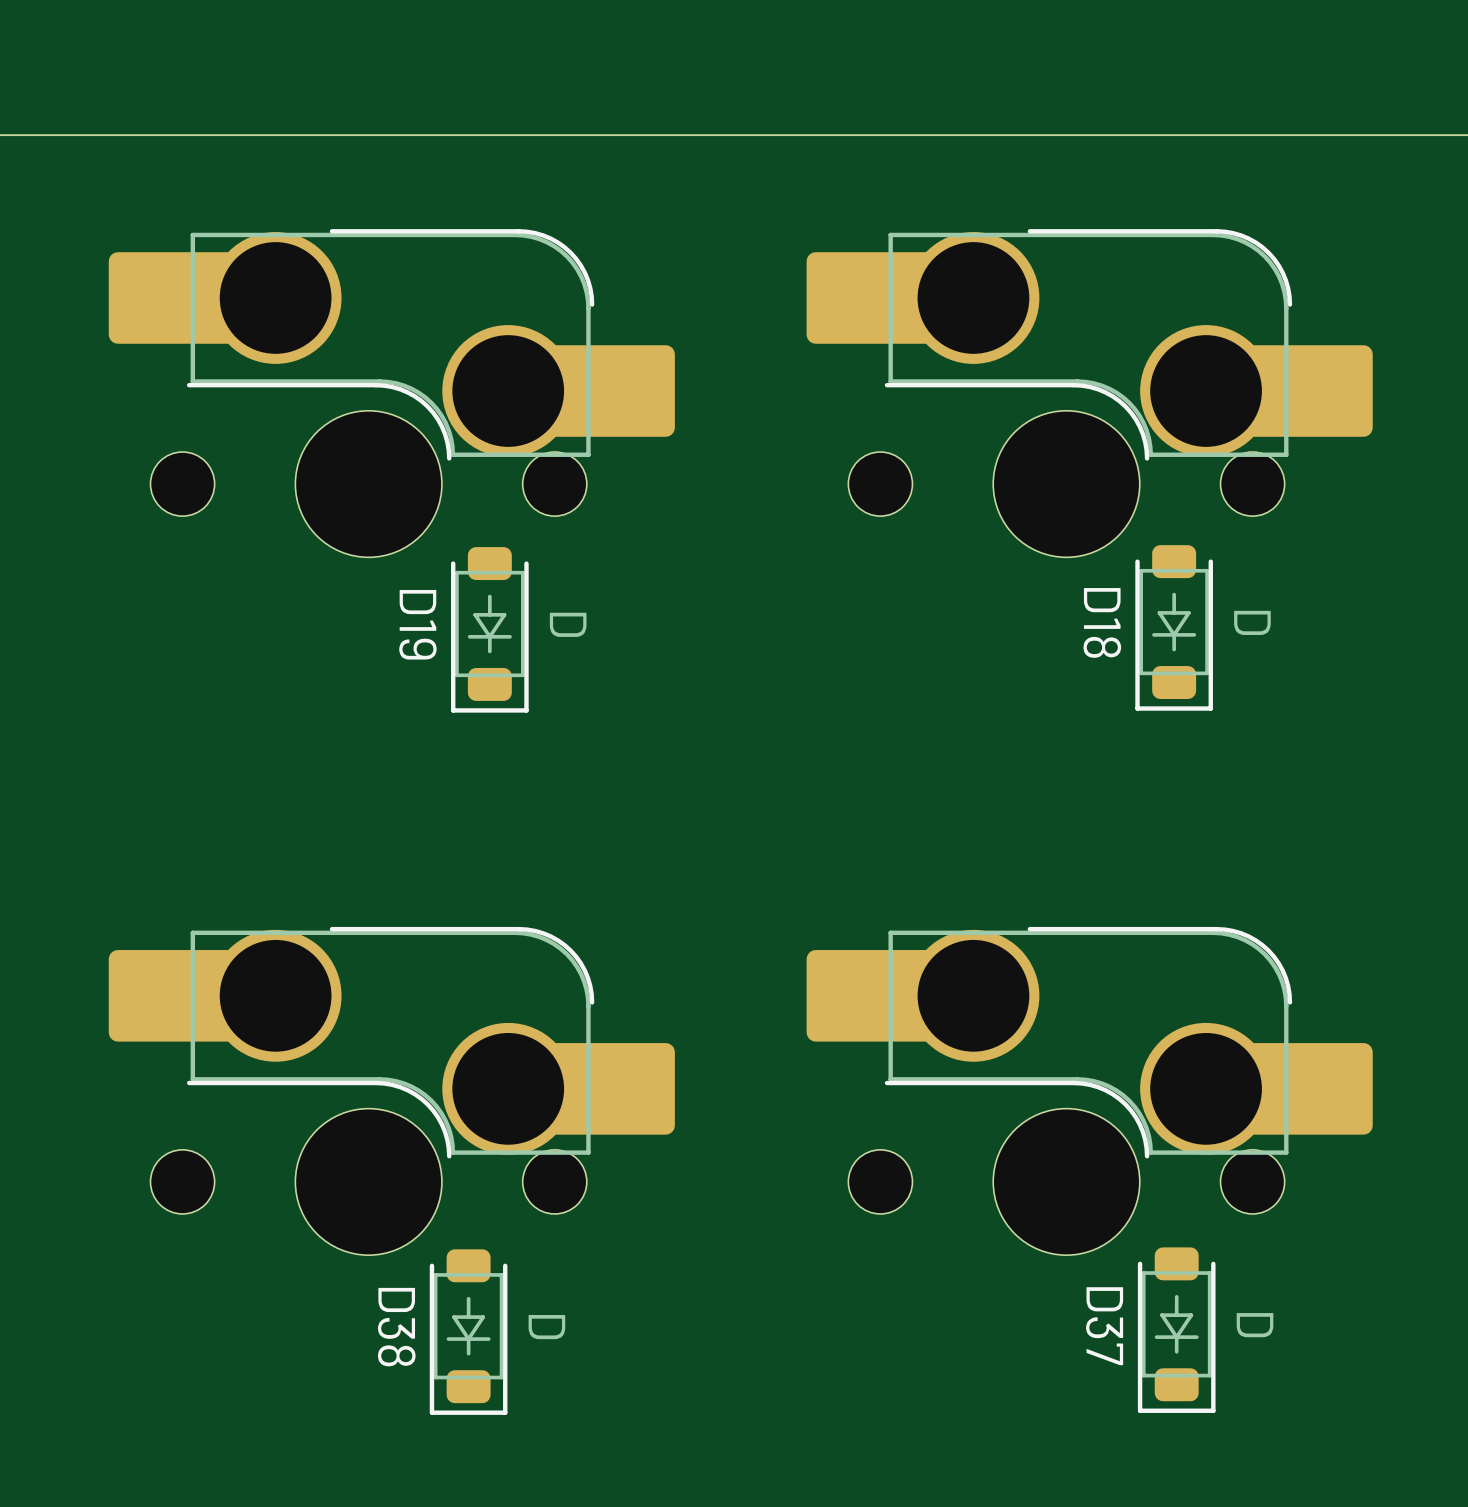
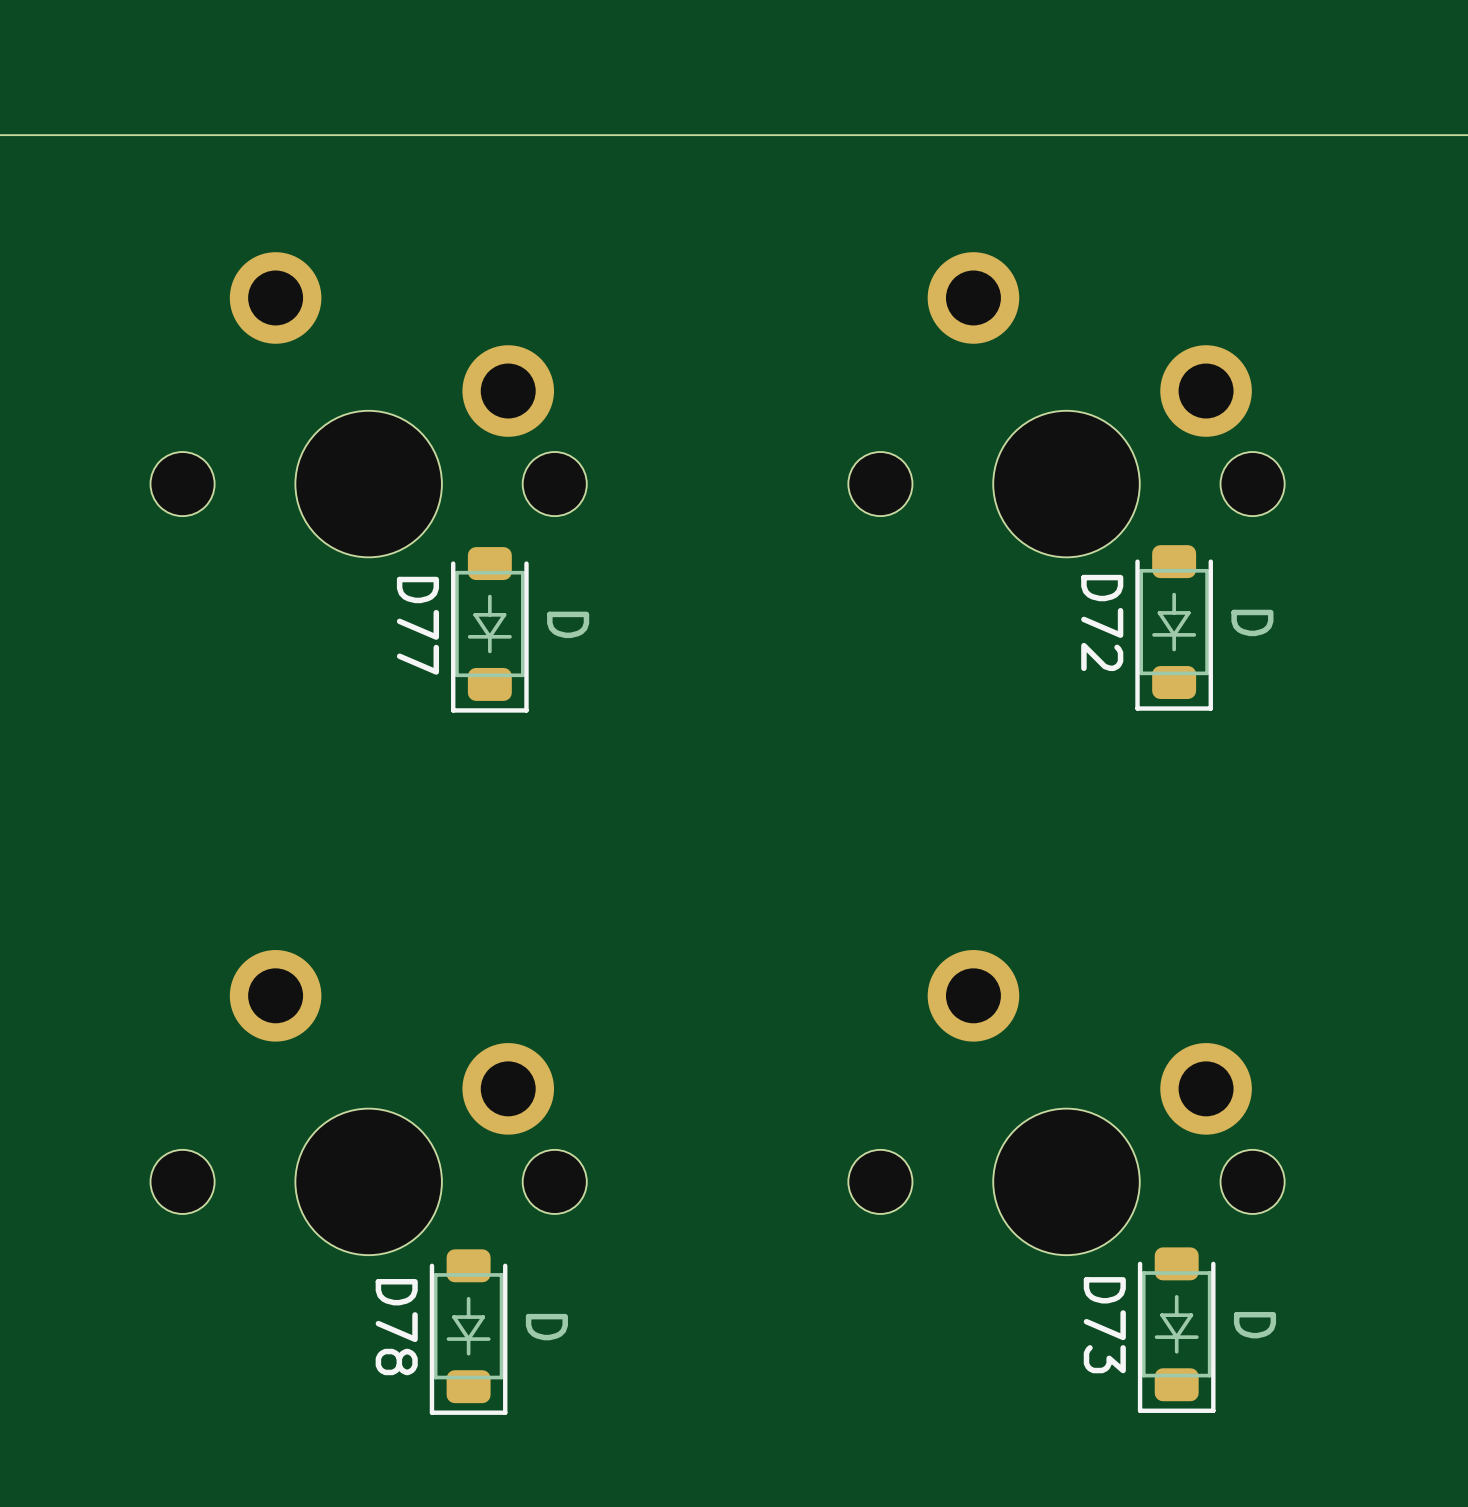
part footprint: [108, 229, 675, 558] -> [150, 252, 587, 558]
part footprint: [806, 229, 1373, 558] -> [848, 252, 1285, 558]
D18 name: D18 (1102, 622) -> D72 (1102, 622)
D19 name: D19 (417, 624) -> D77 (417, 625)
part footprint: [108, 926, 675, 1256] -> [150, 950, 587, 1256]
part footprint: [806, 926, 1373, 1256] -> [848, 950, 1285, 1256]
D37 name: D37 (1104, 1326) -> D73 (1104, 1325)
D38 name: D38 (396, 1327) -> D78 (396, 1327)

